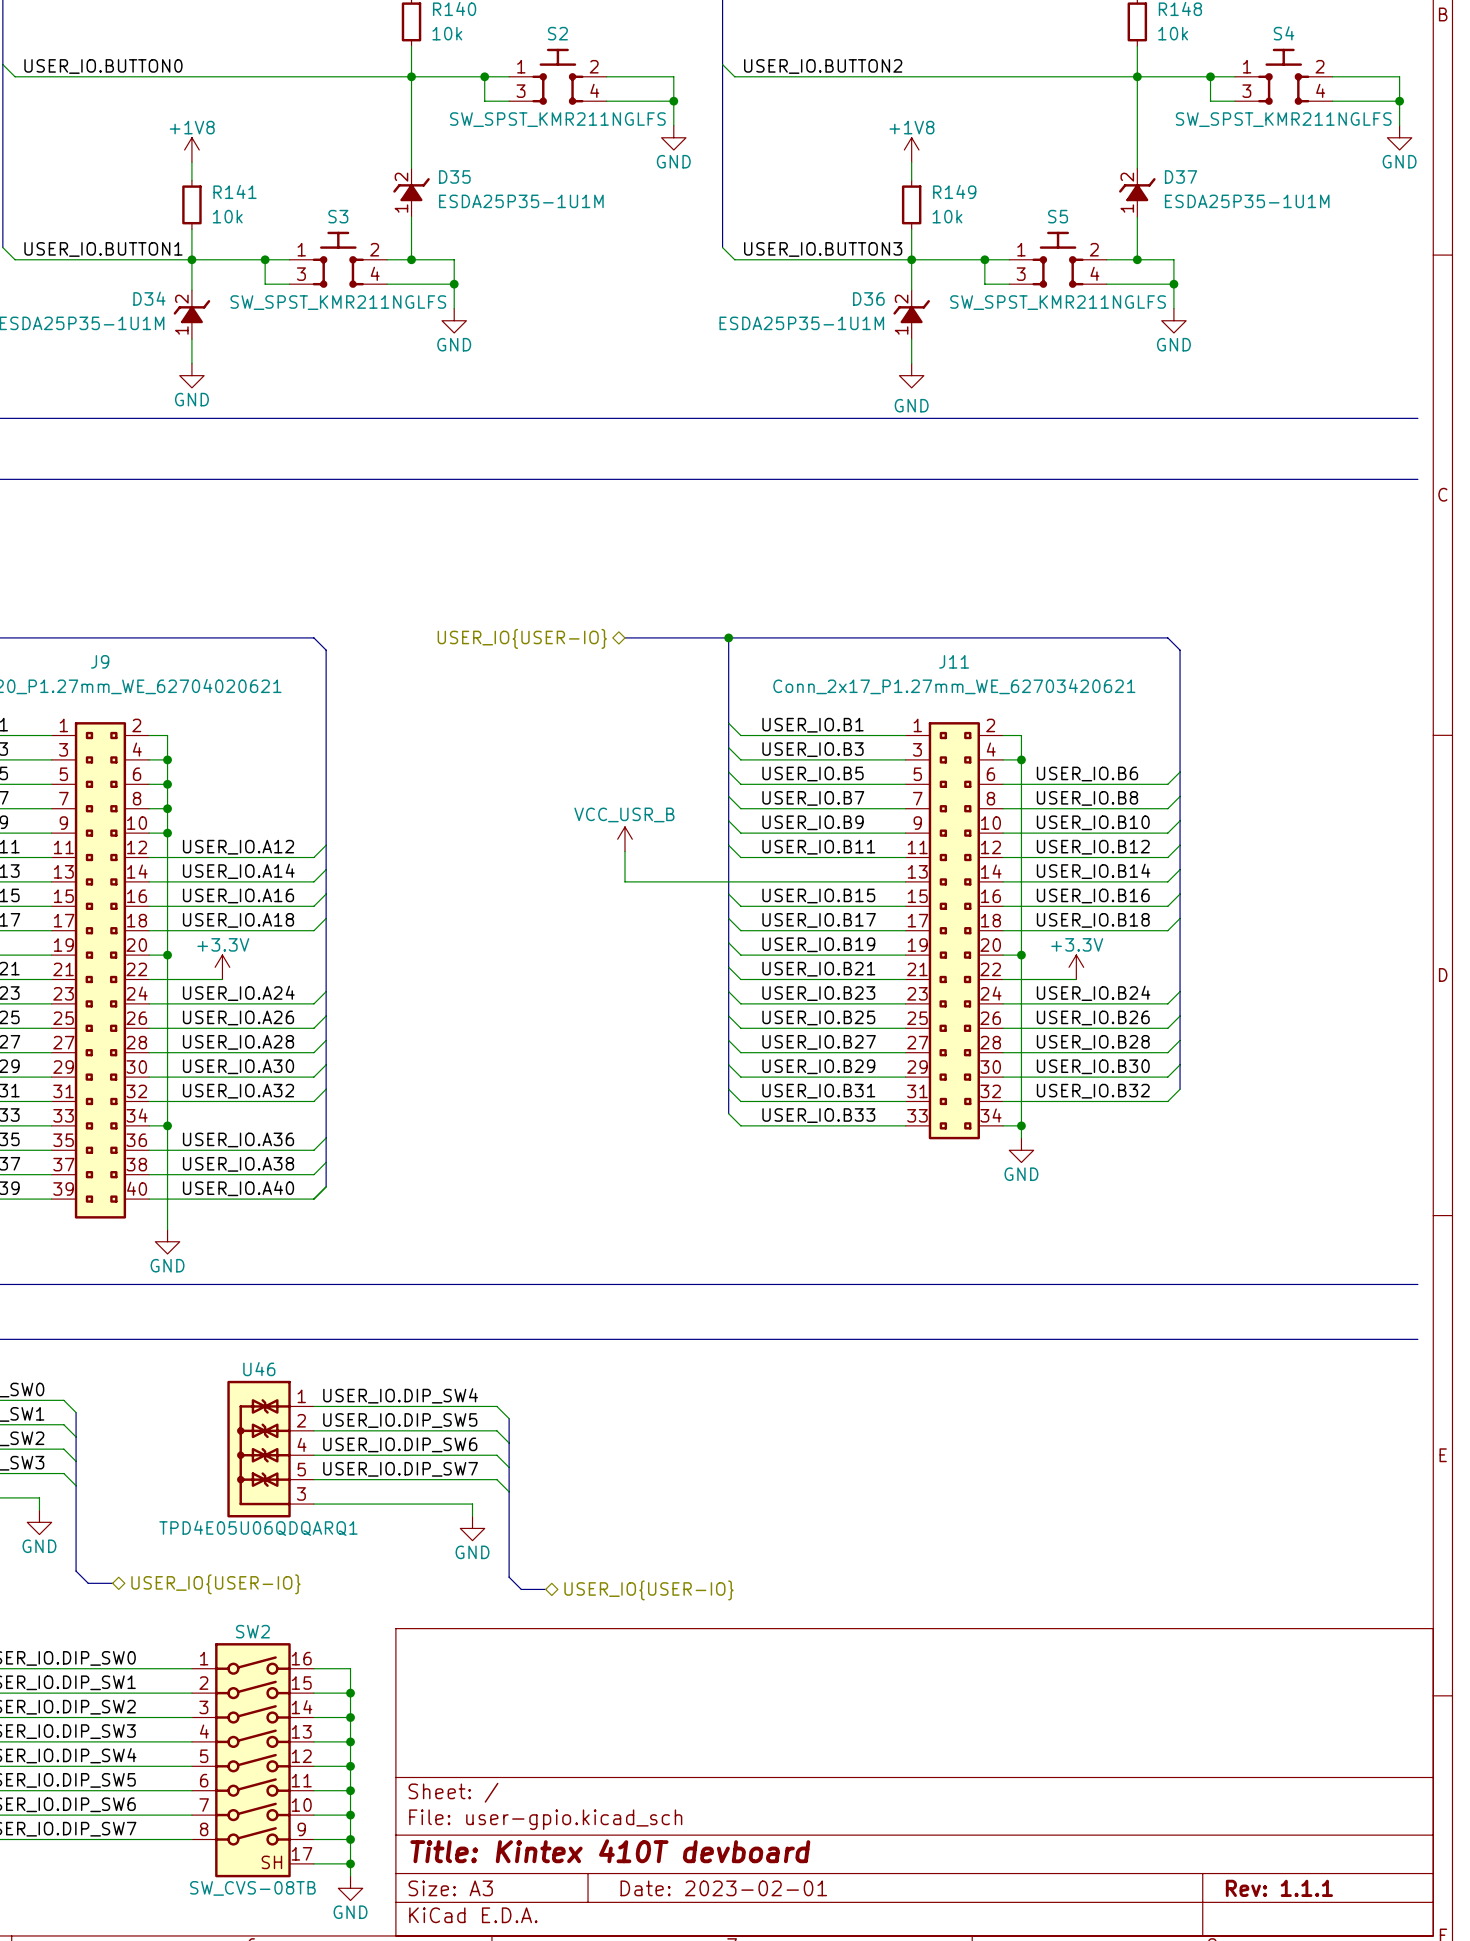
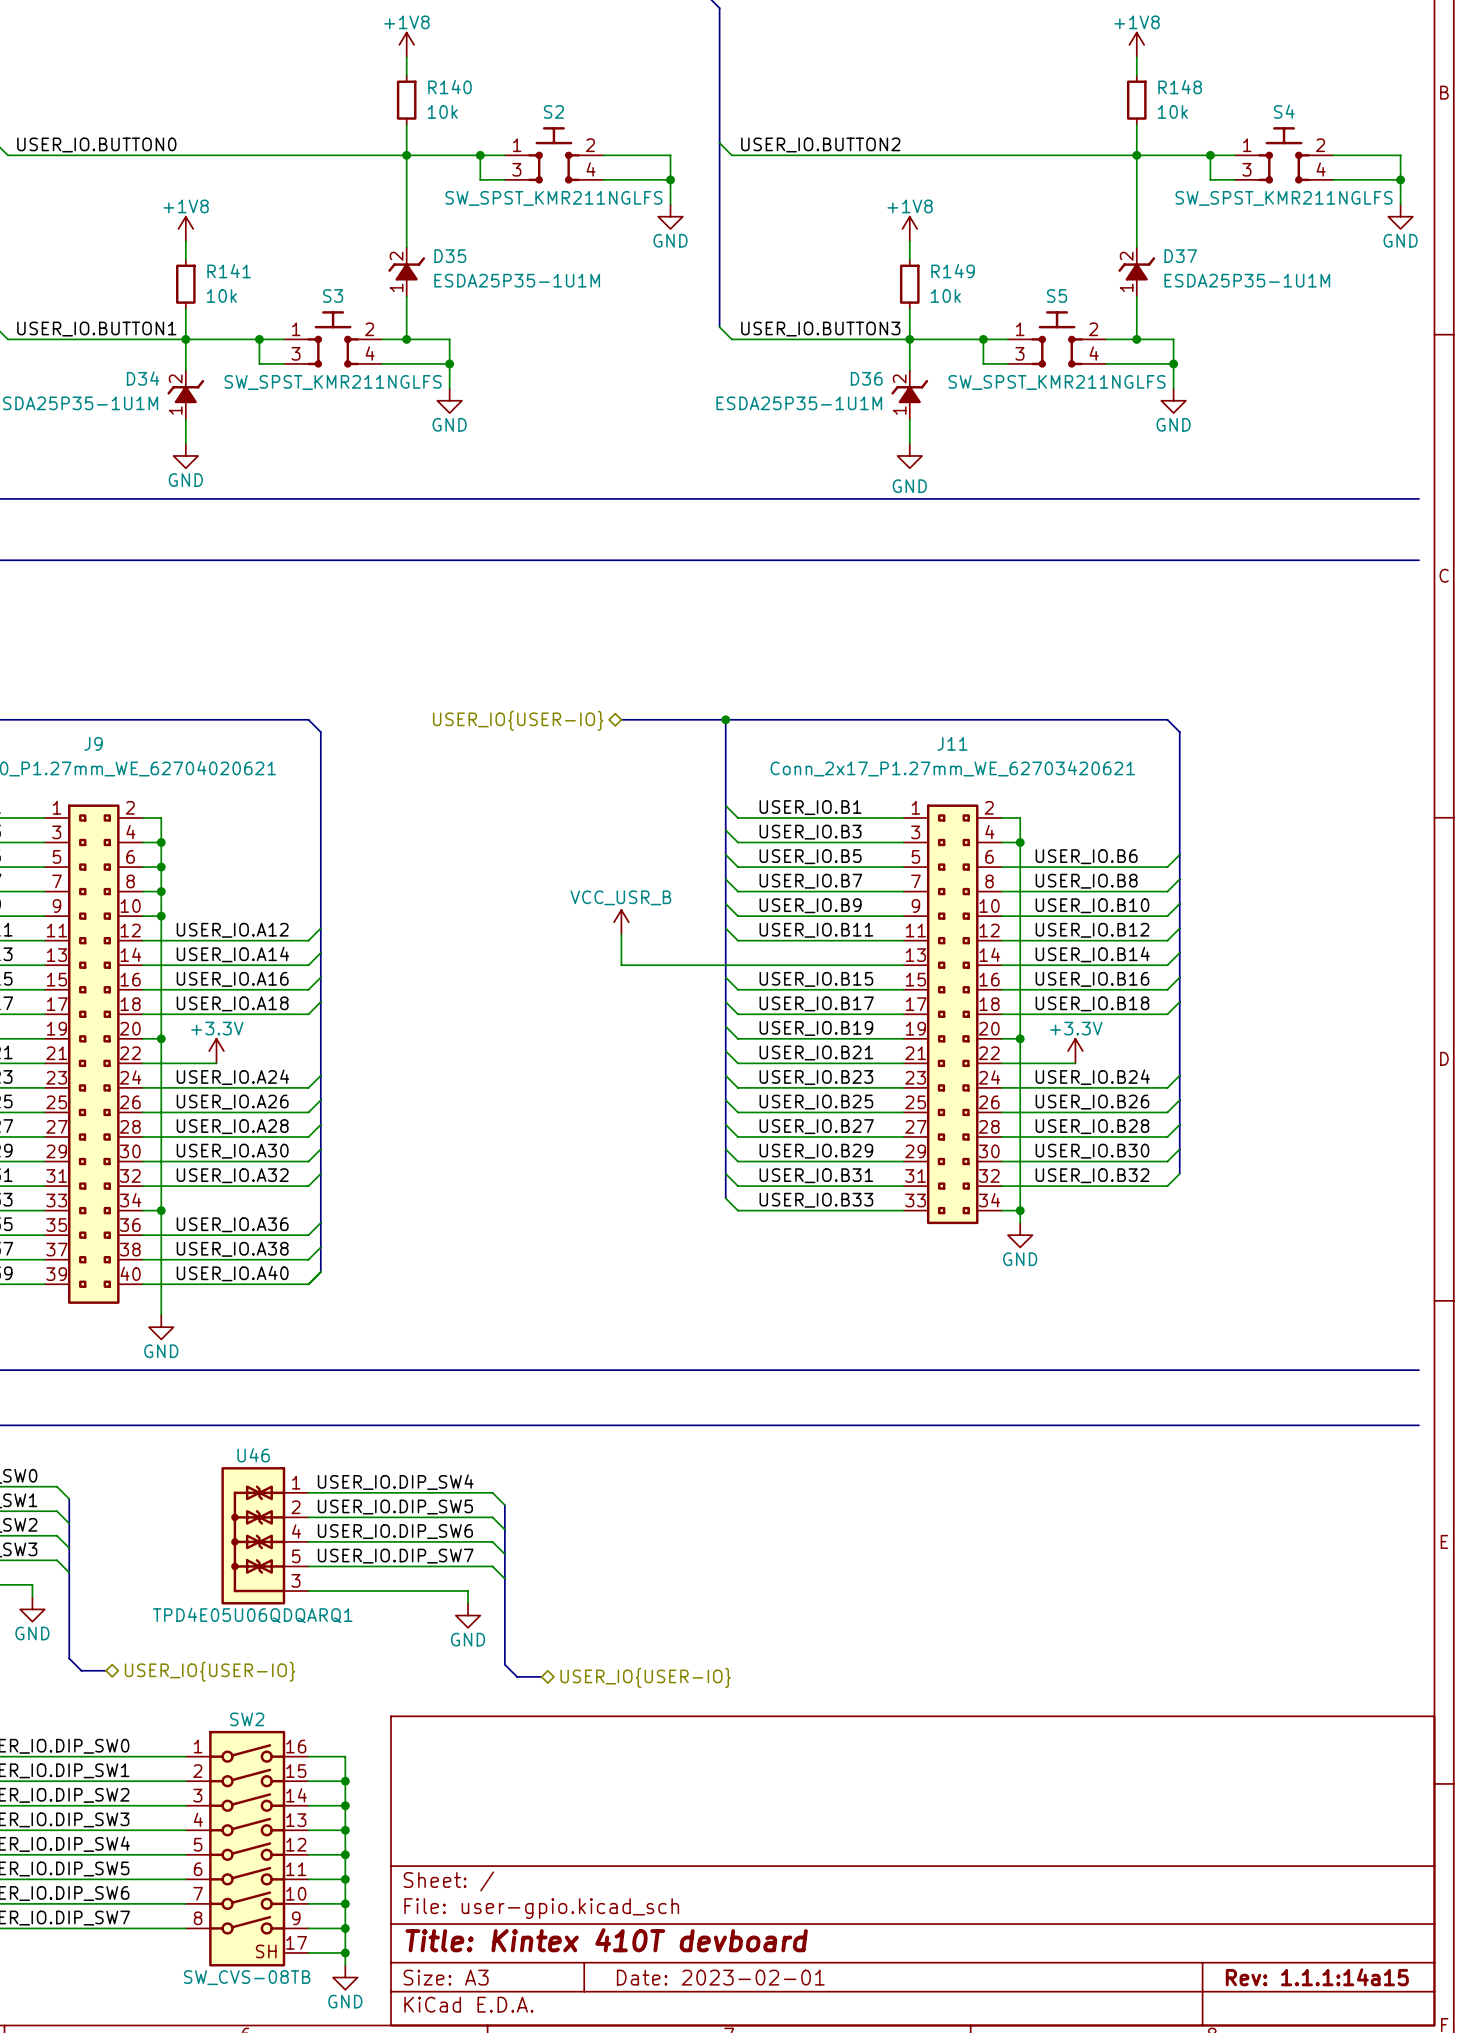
title block: Rev: 1.1.1 (1279, 1888) -> Rev: 1.1.1:14a15 (1317, 1977)

